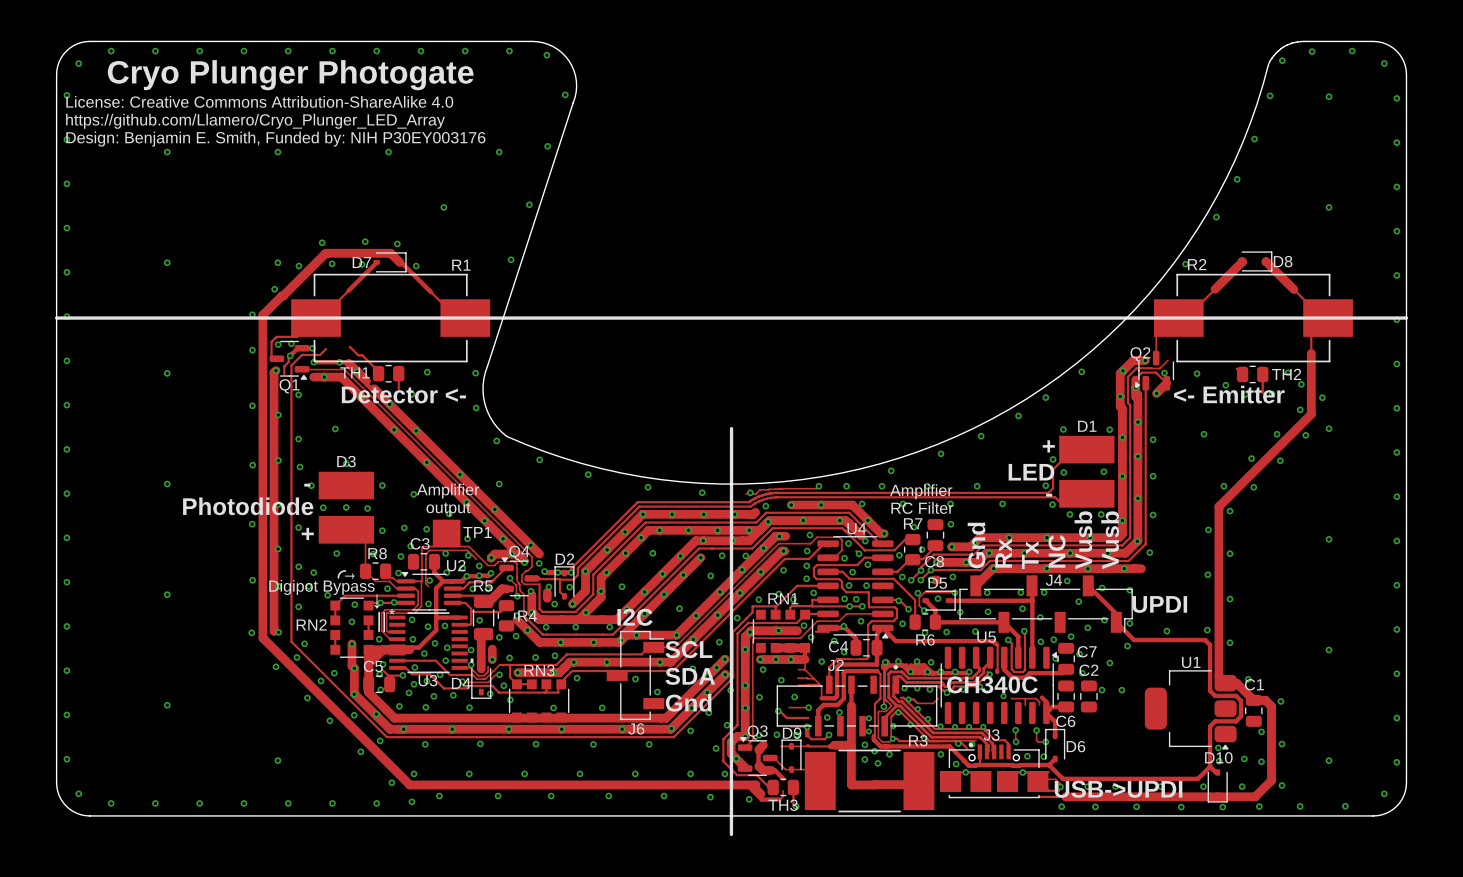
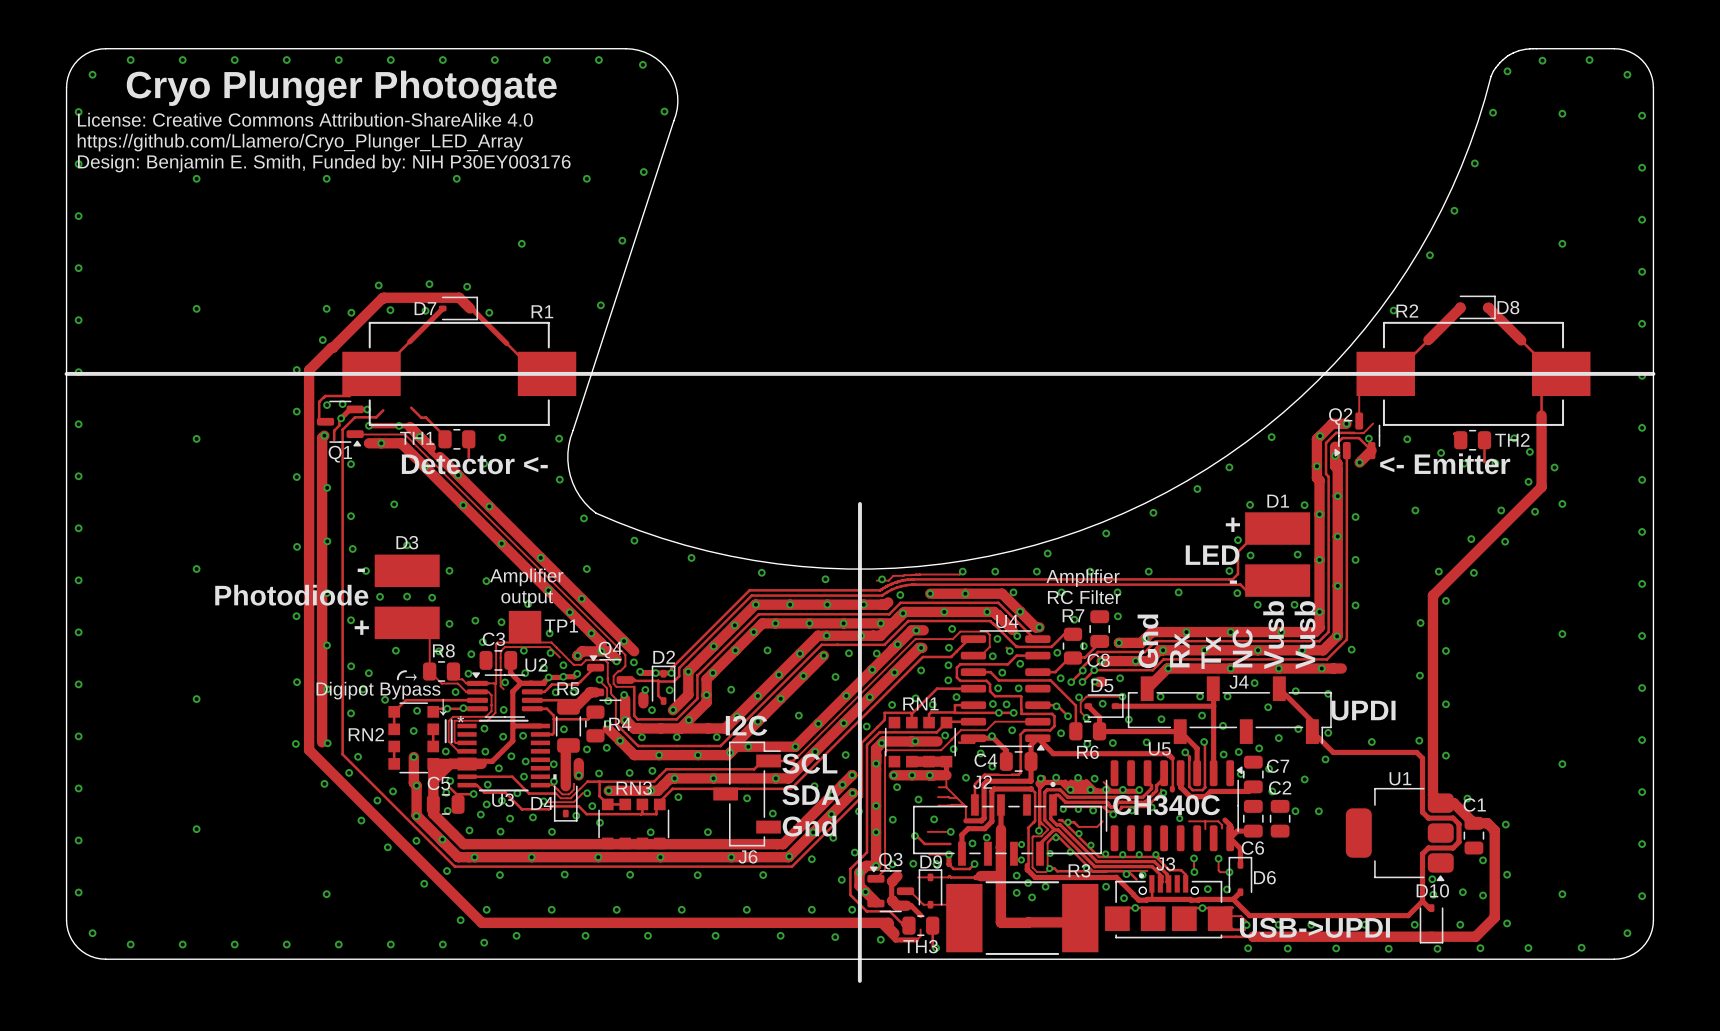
track: none -> (1103, 782) (1113, 792)

